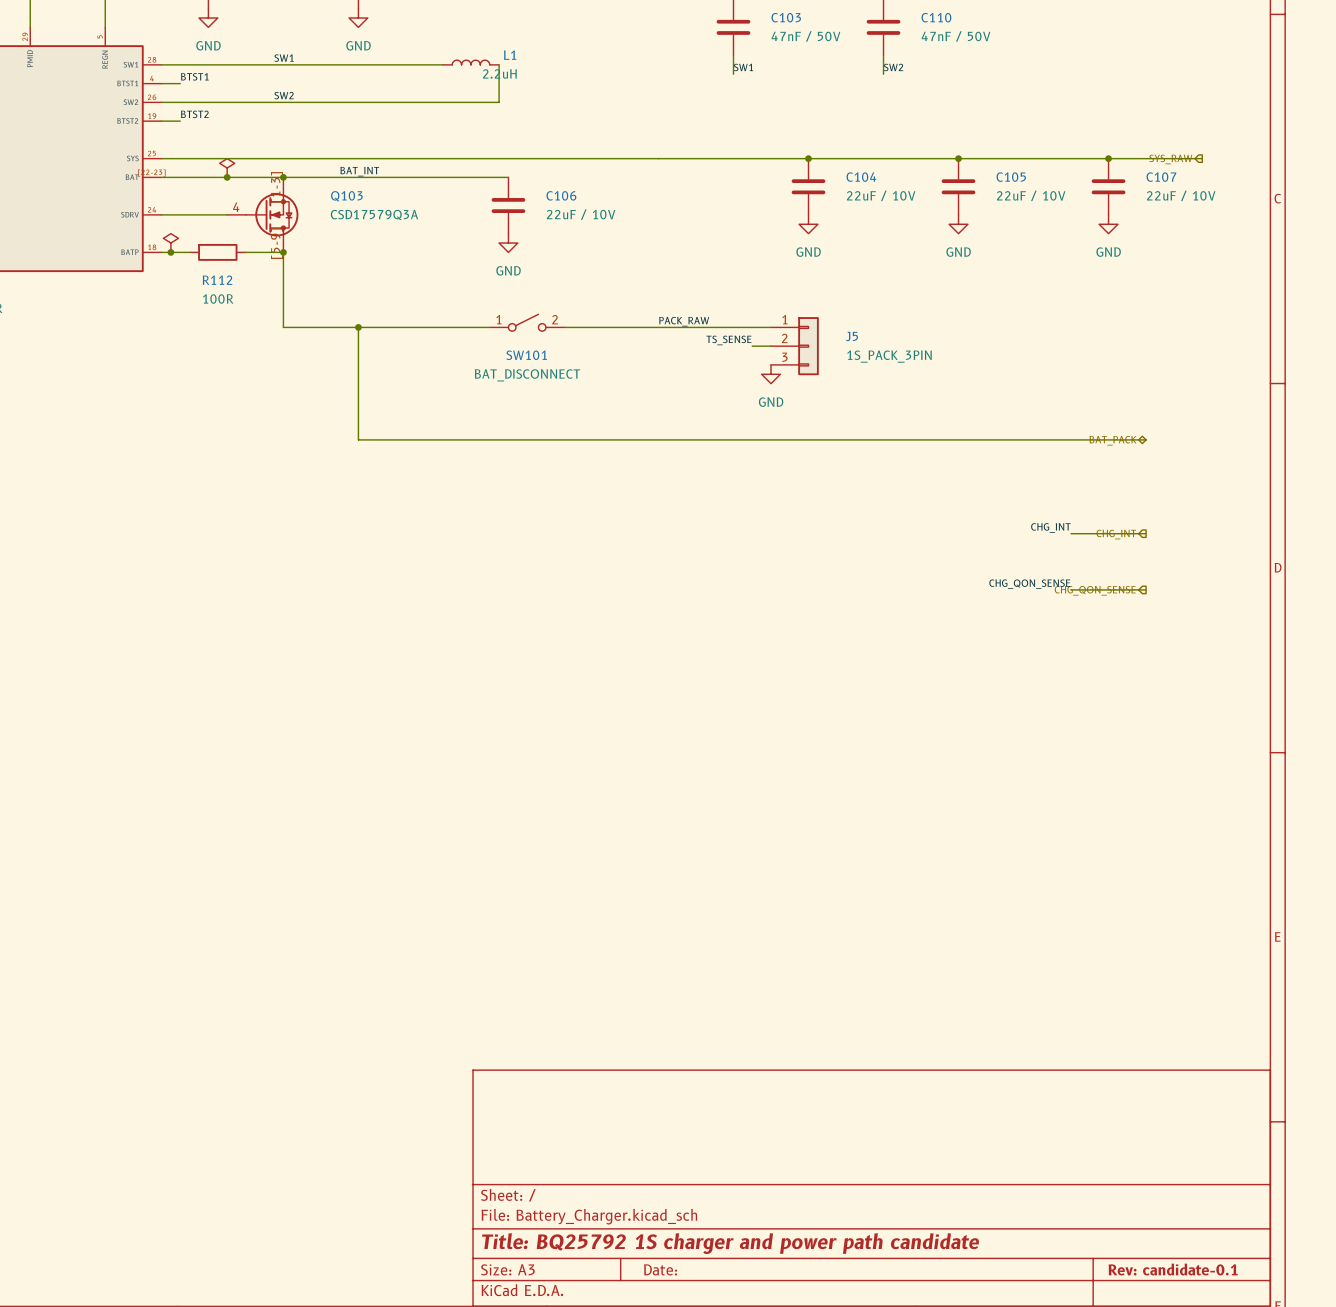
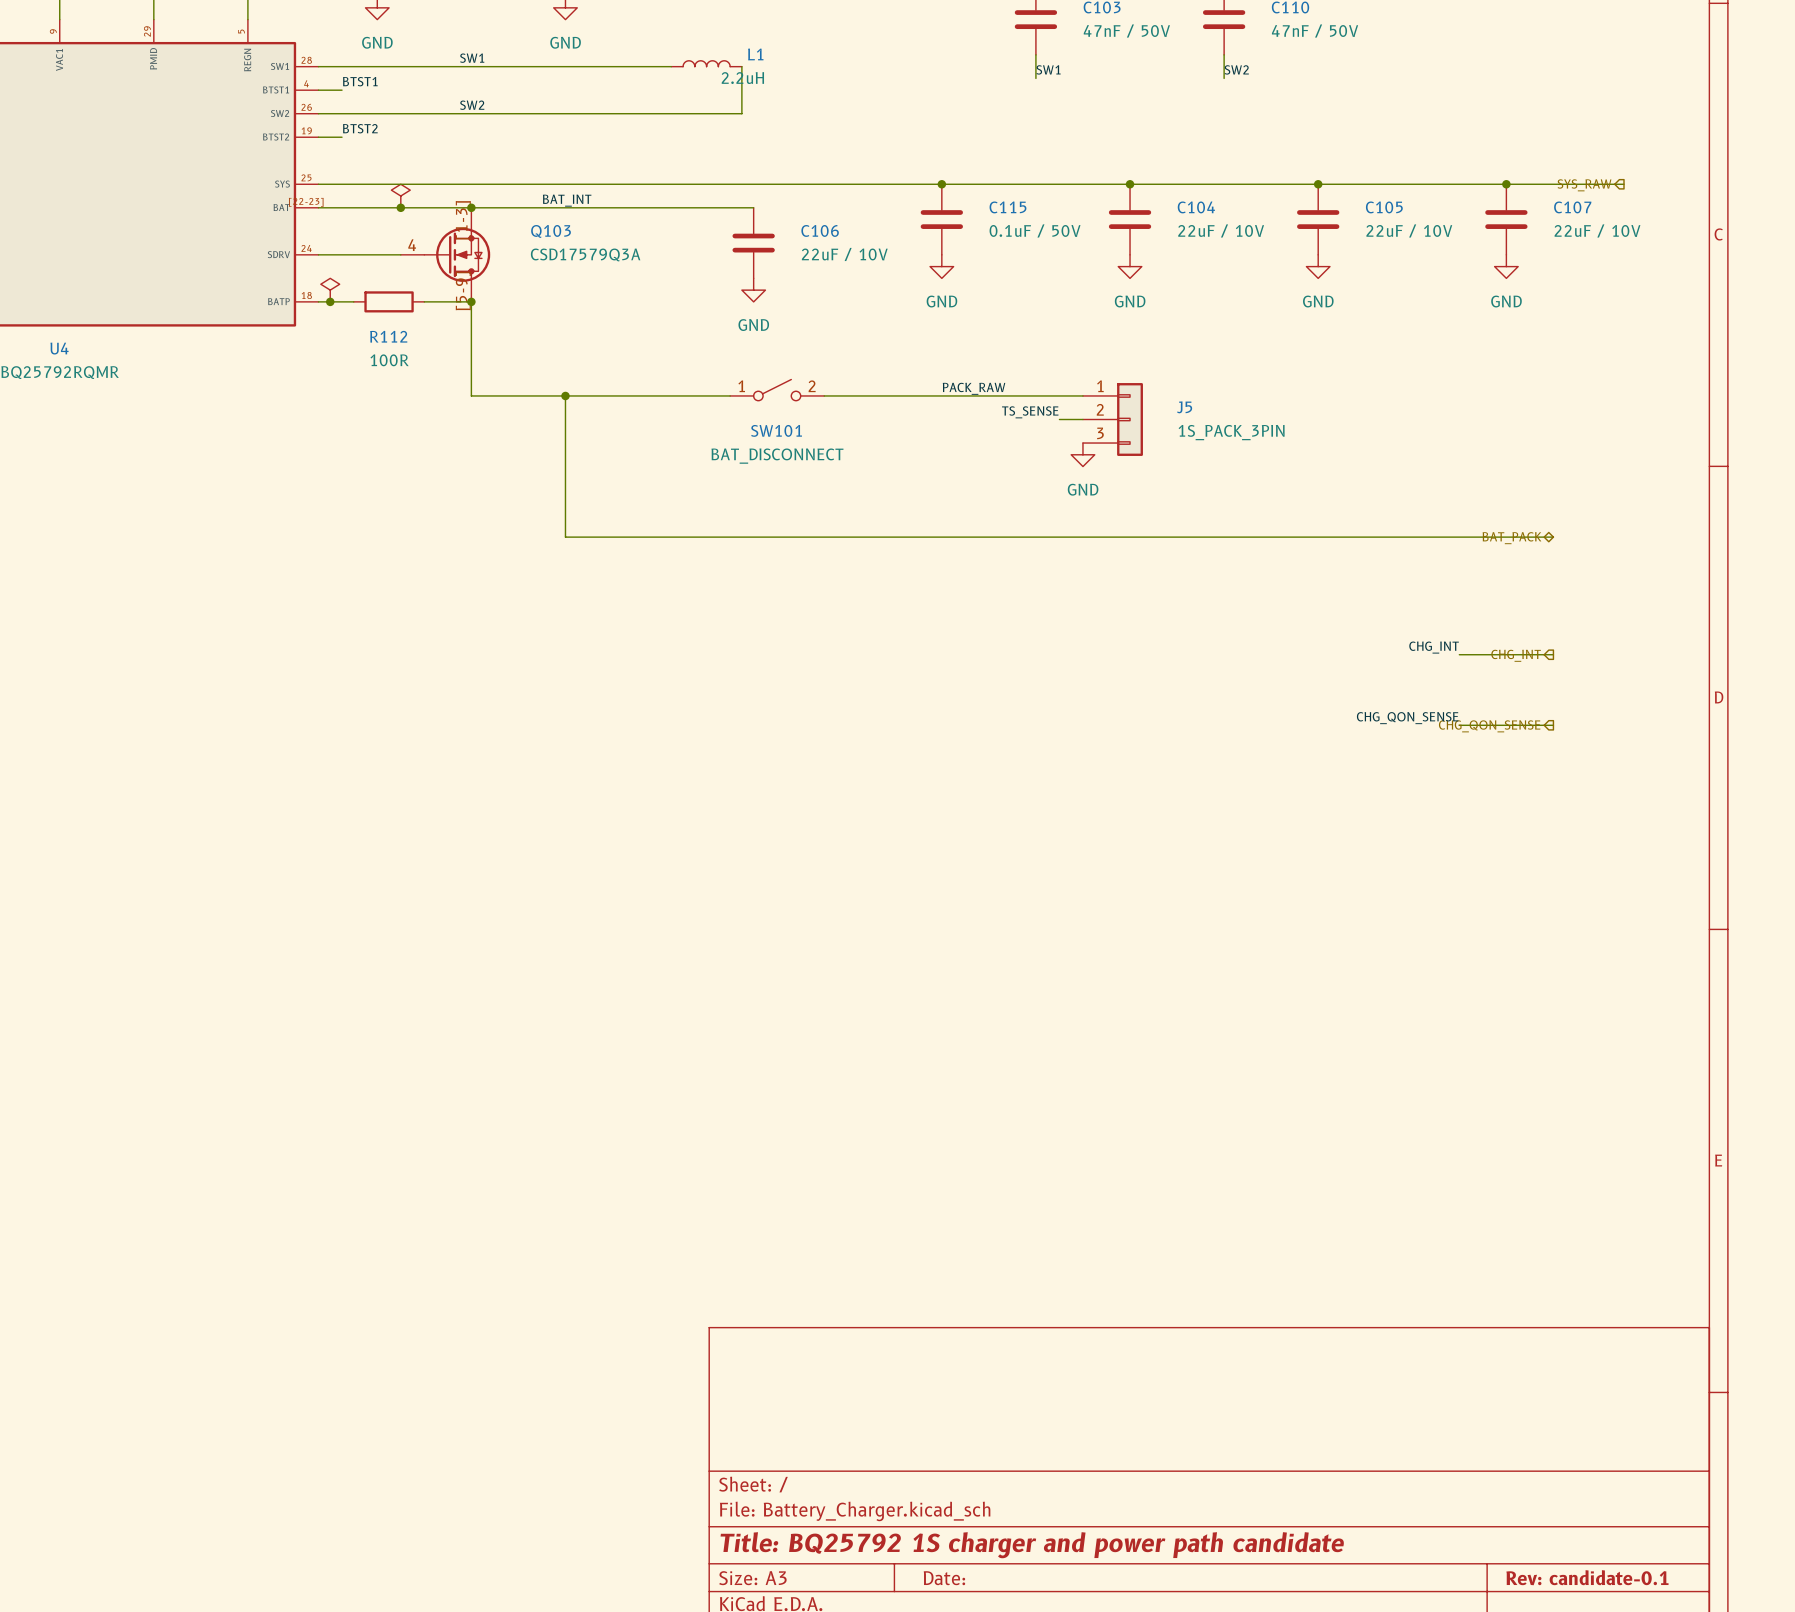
junction: none -> (941, 184)
C115: none -> 0.1uF / 50V (941, 219)
power symbol: none -> GND (941, 266)

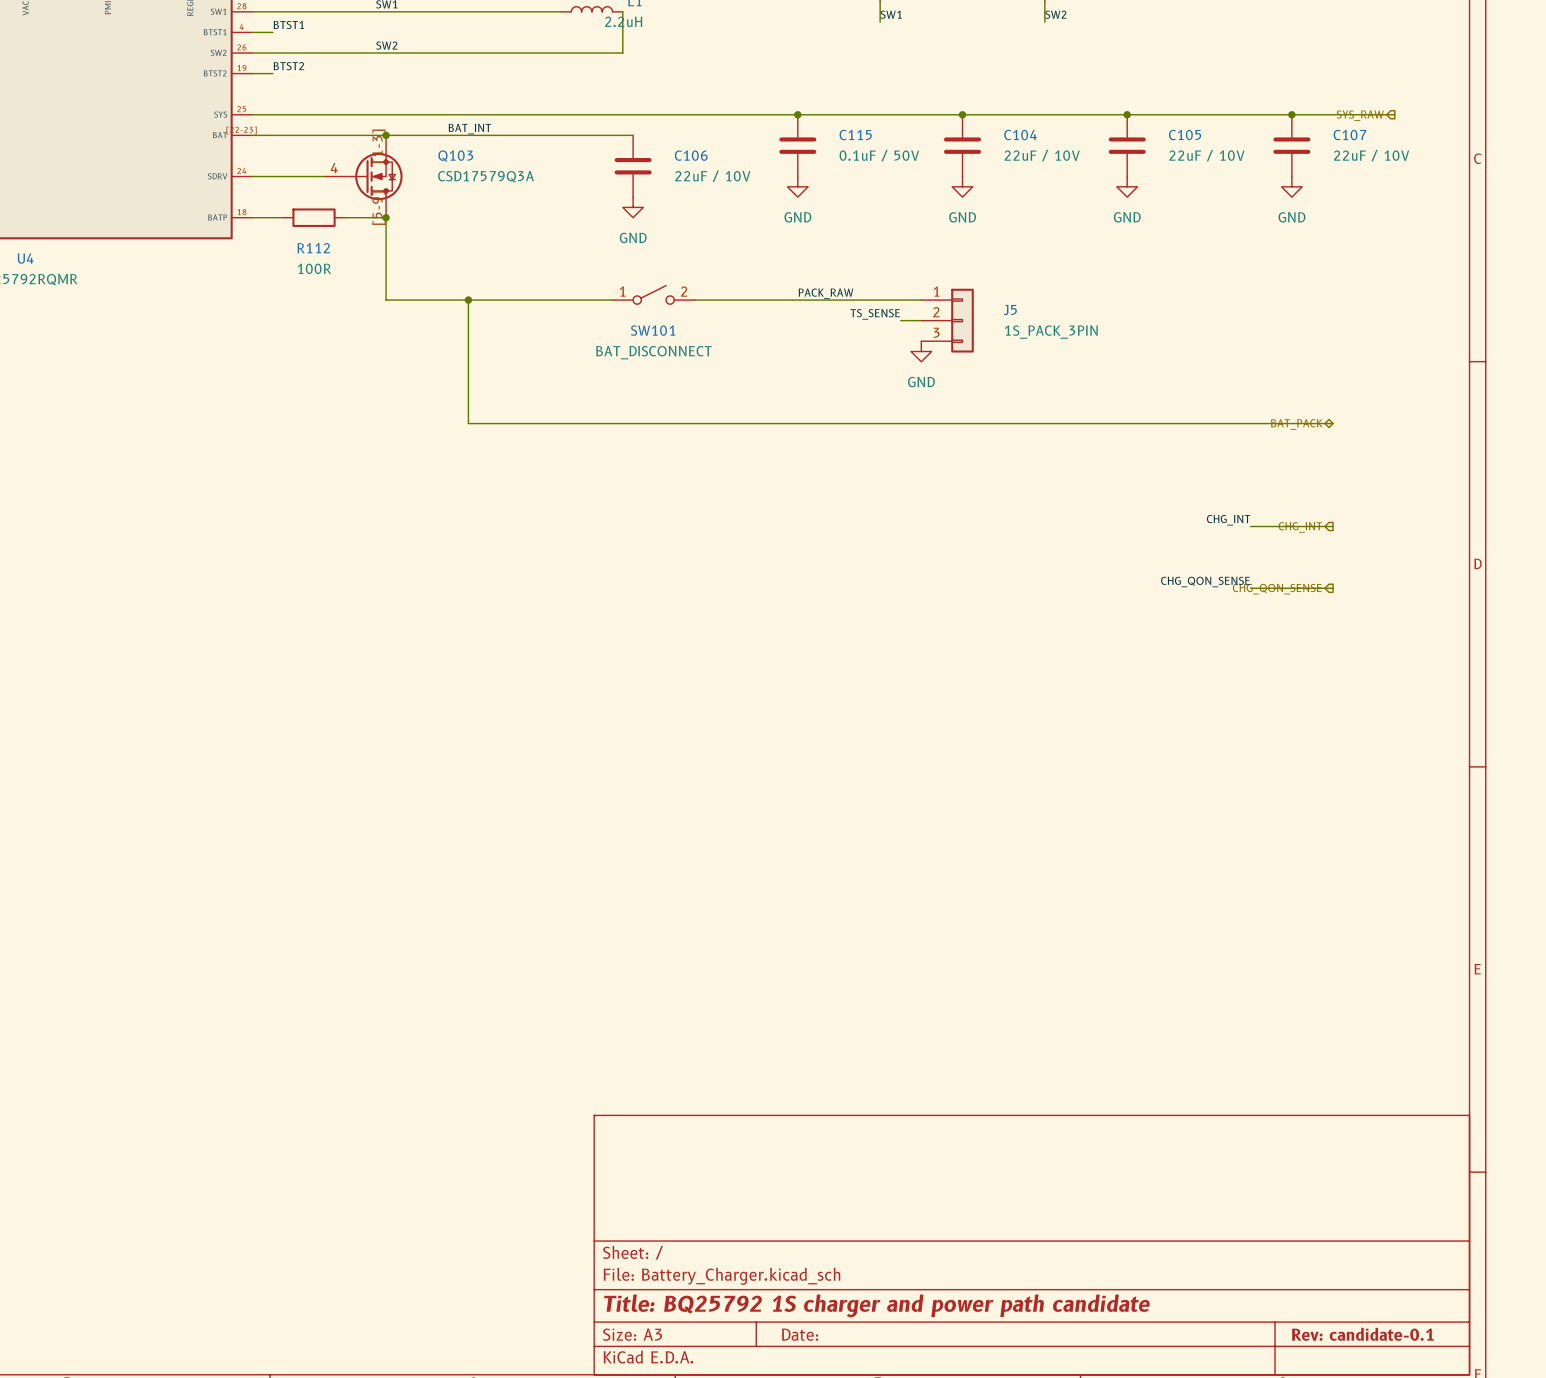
power symbol: (400, 196) -> none
junction: (400, 207) -> none
power symbol: (330, 290) -> none
junction: (330, 301) -> none

